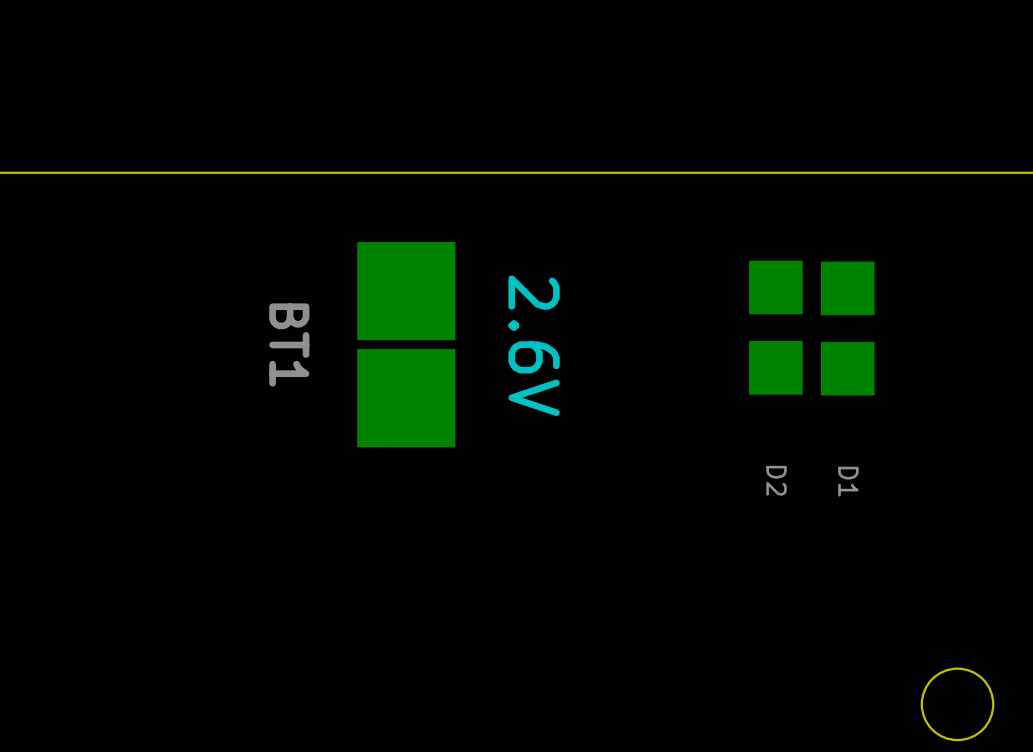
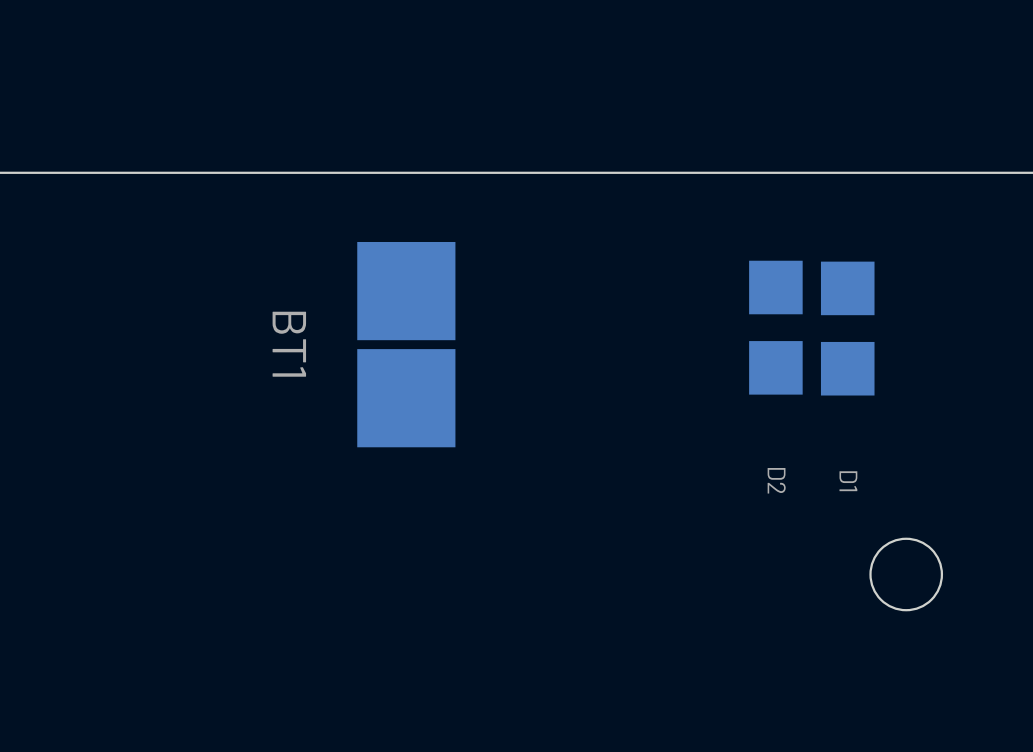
BT1 value: 2.6V (534, 345) -> none
round board edge position: (957, 704) -> (906, 574)

